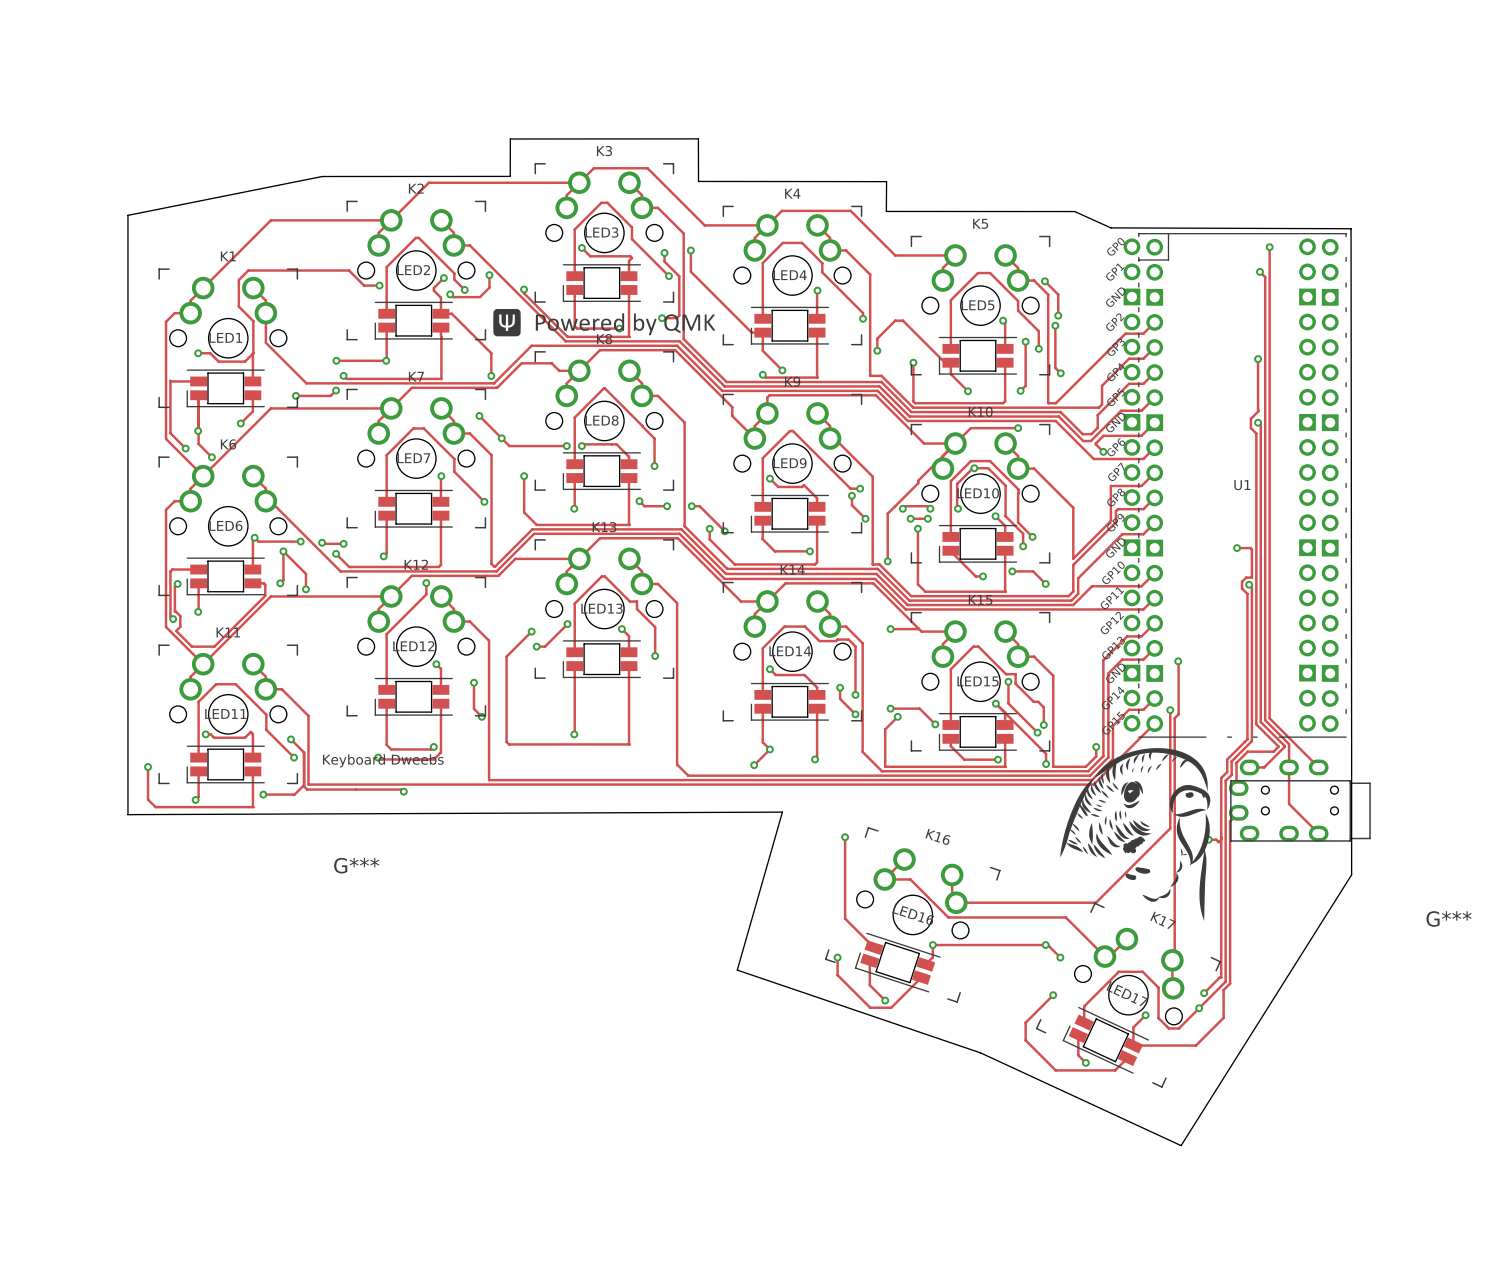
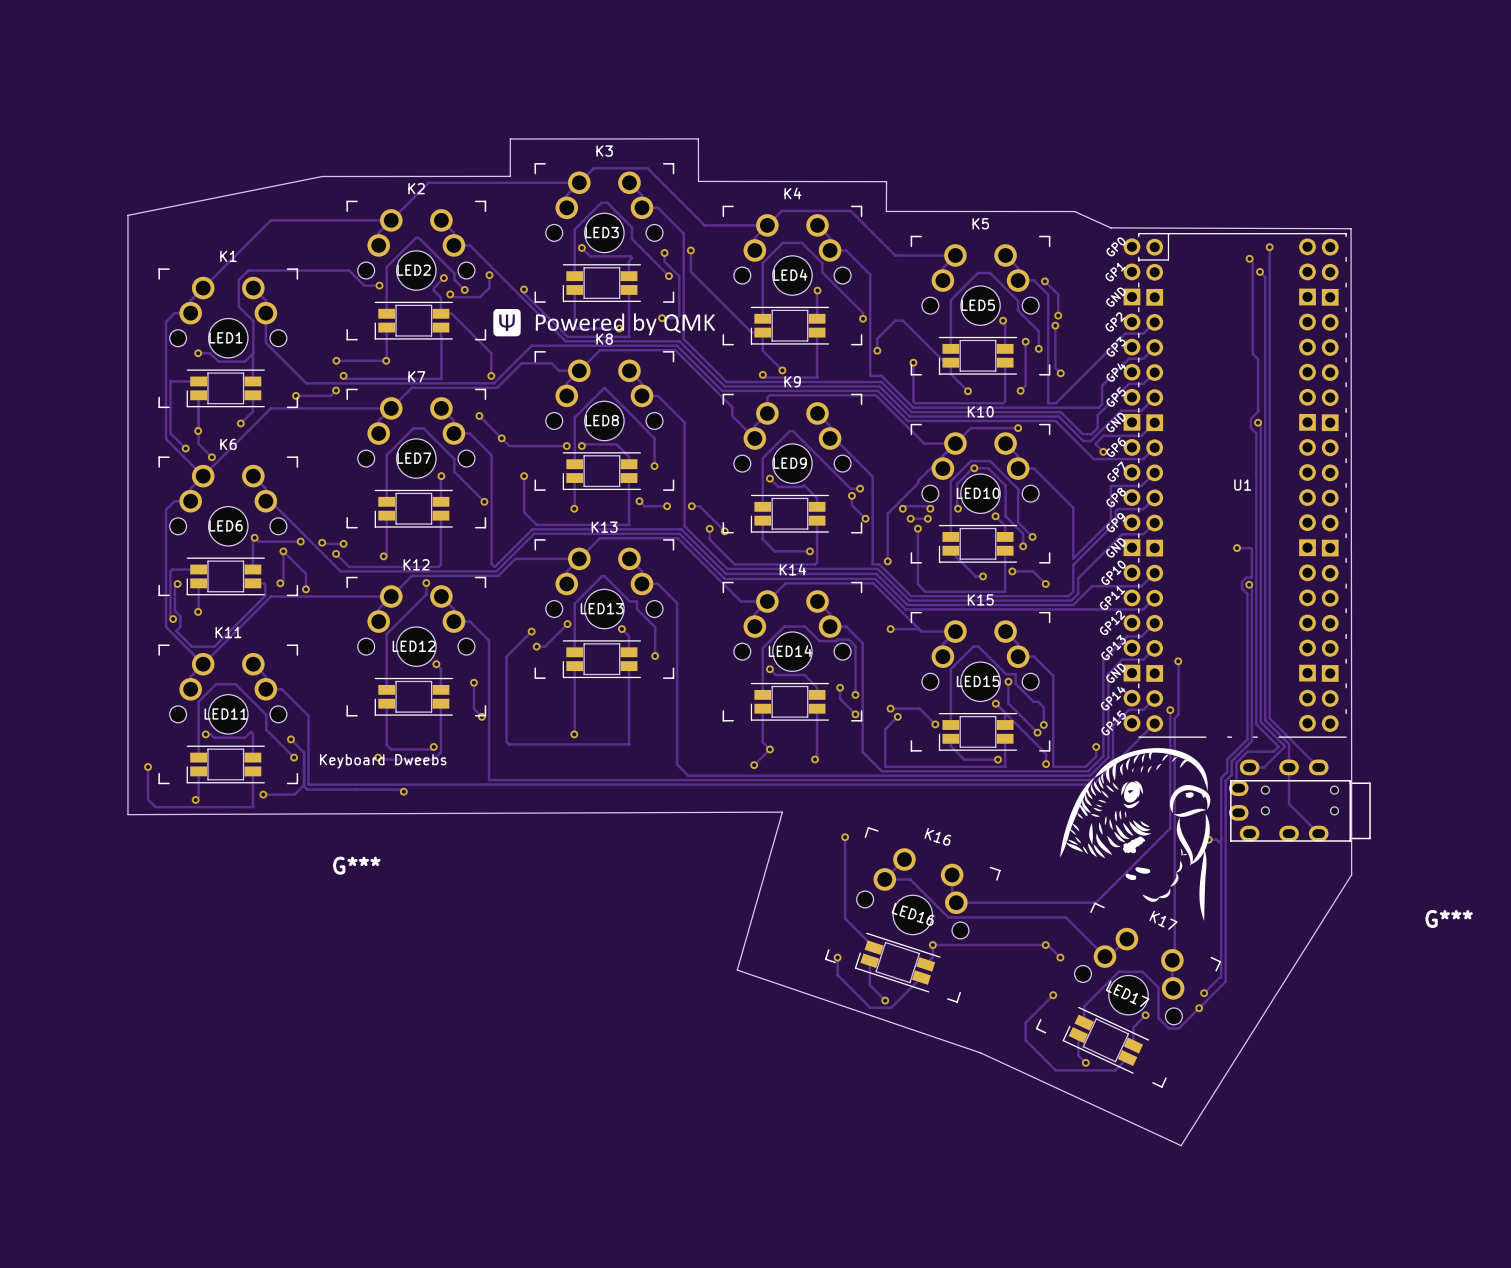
track: none -> (1249, 258) (1252, 261) (1252, 353) (1258, 359)
via: none -> (1249, 258)
via: (1258, 359) -> none
track: (1238, 812) (1230, 821) (1230, 983) (1223, 990) (1223, 1017) (1195, 1045) (1133, 1045) -> none

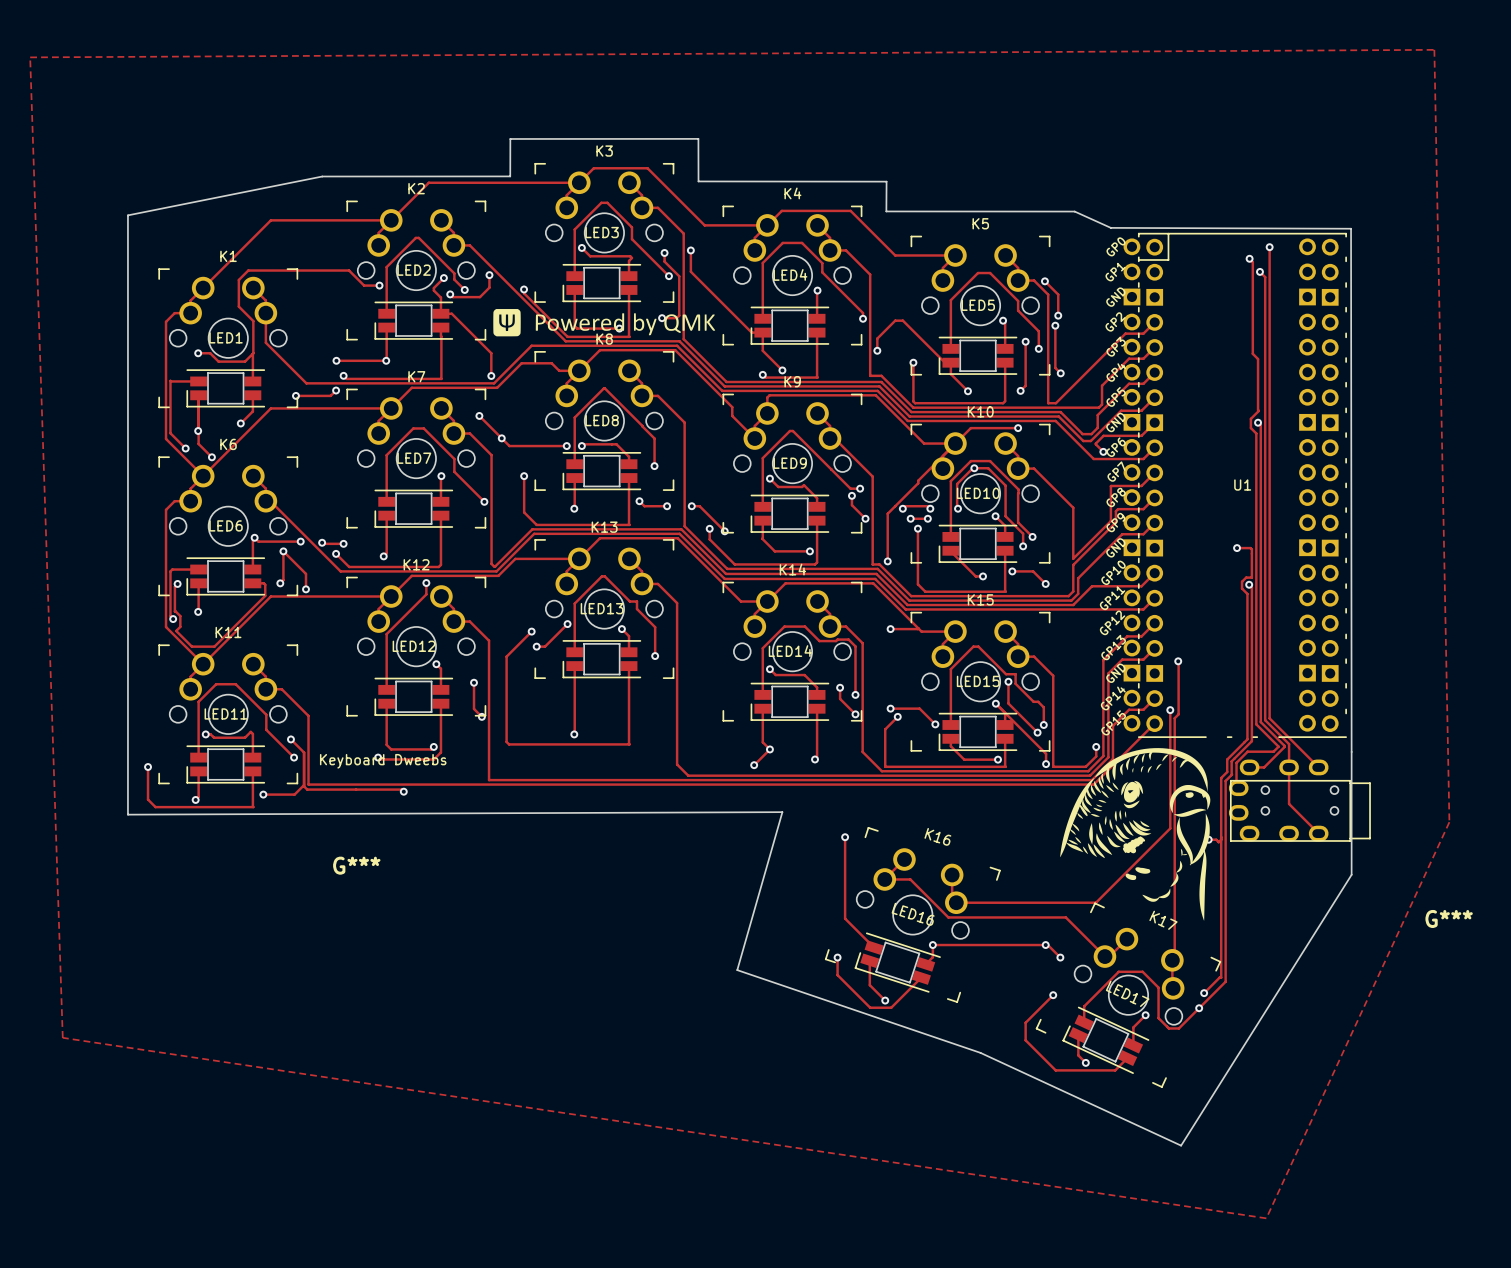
zone outline: none -> (1434, 49) (30, 57) (62, 1037) (1266, 1218) (1449, 822) (1434, 49)

